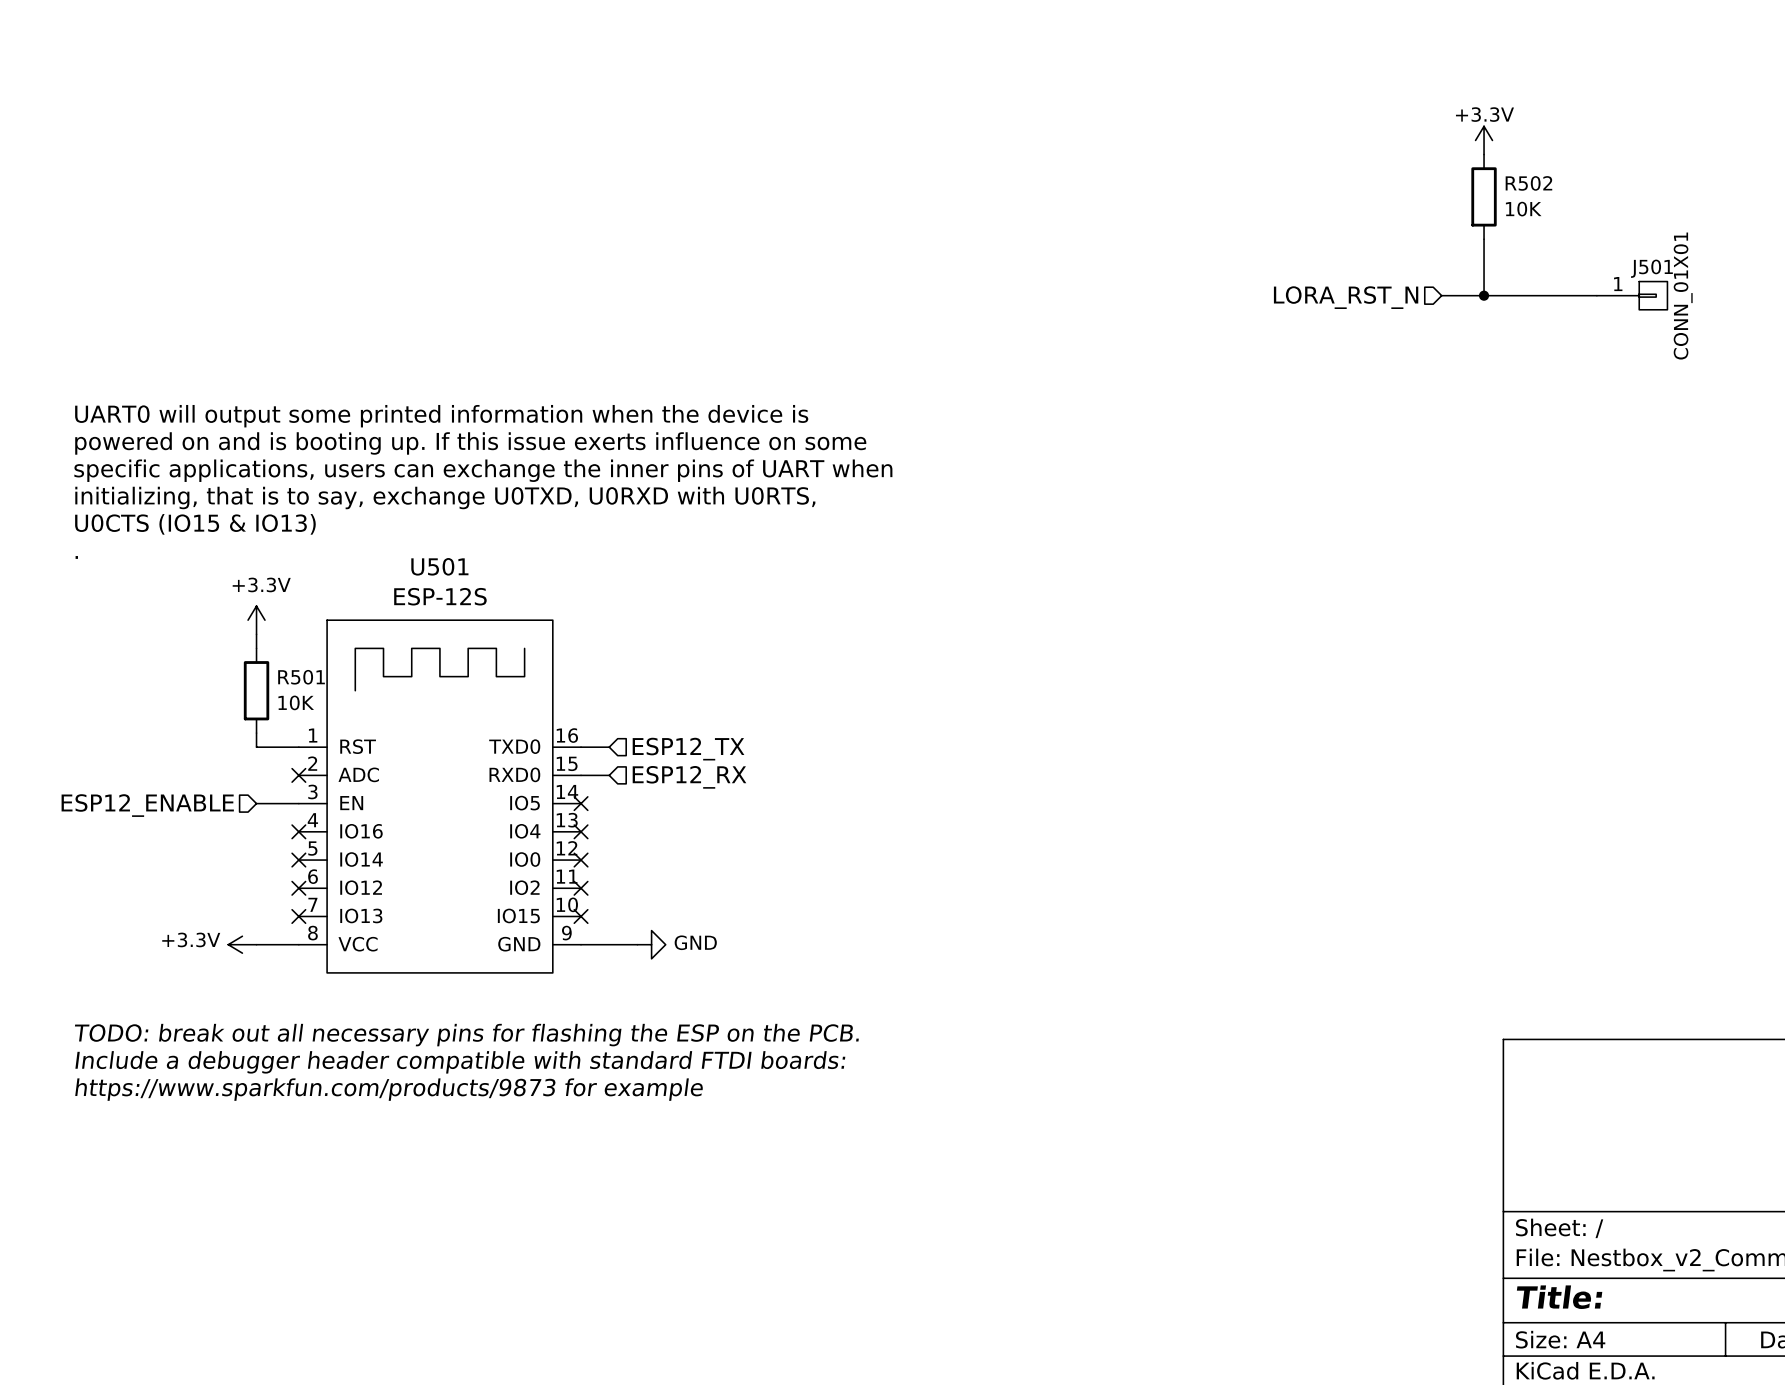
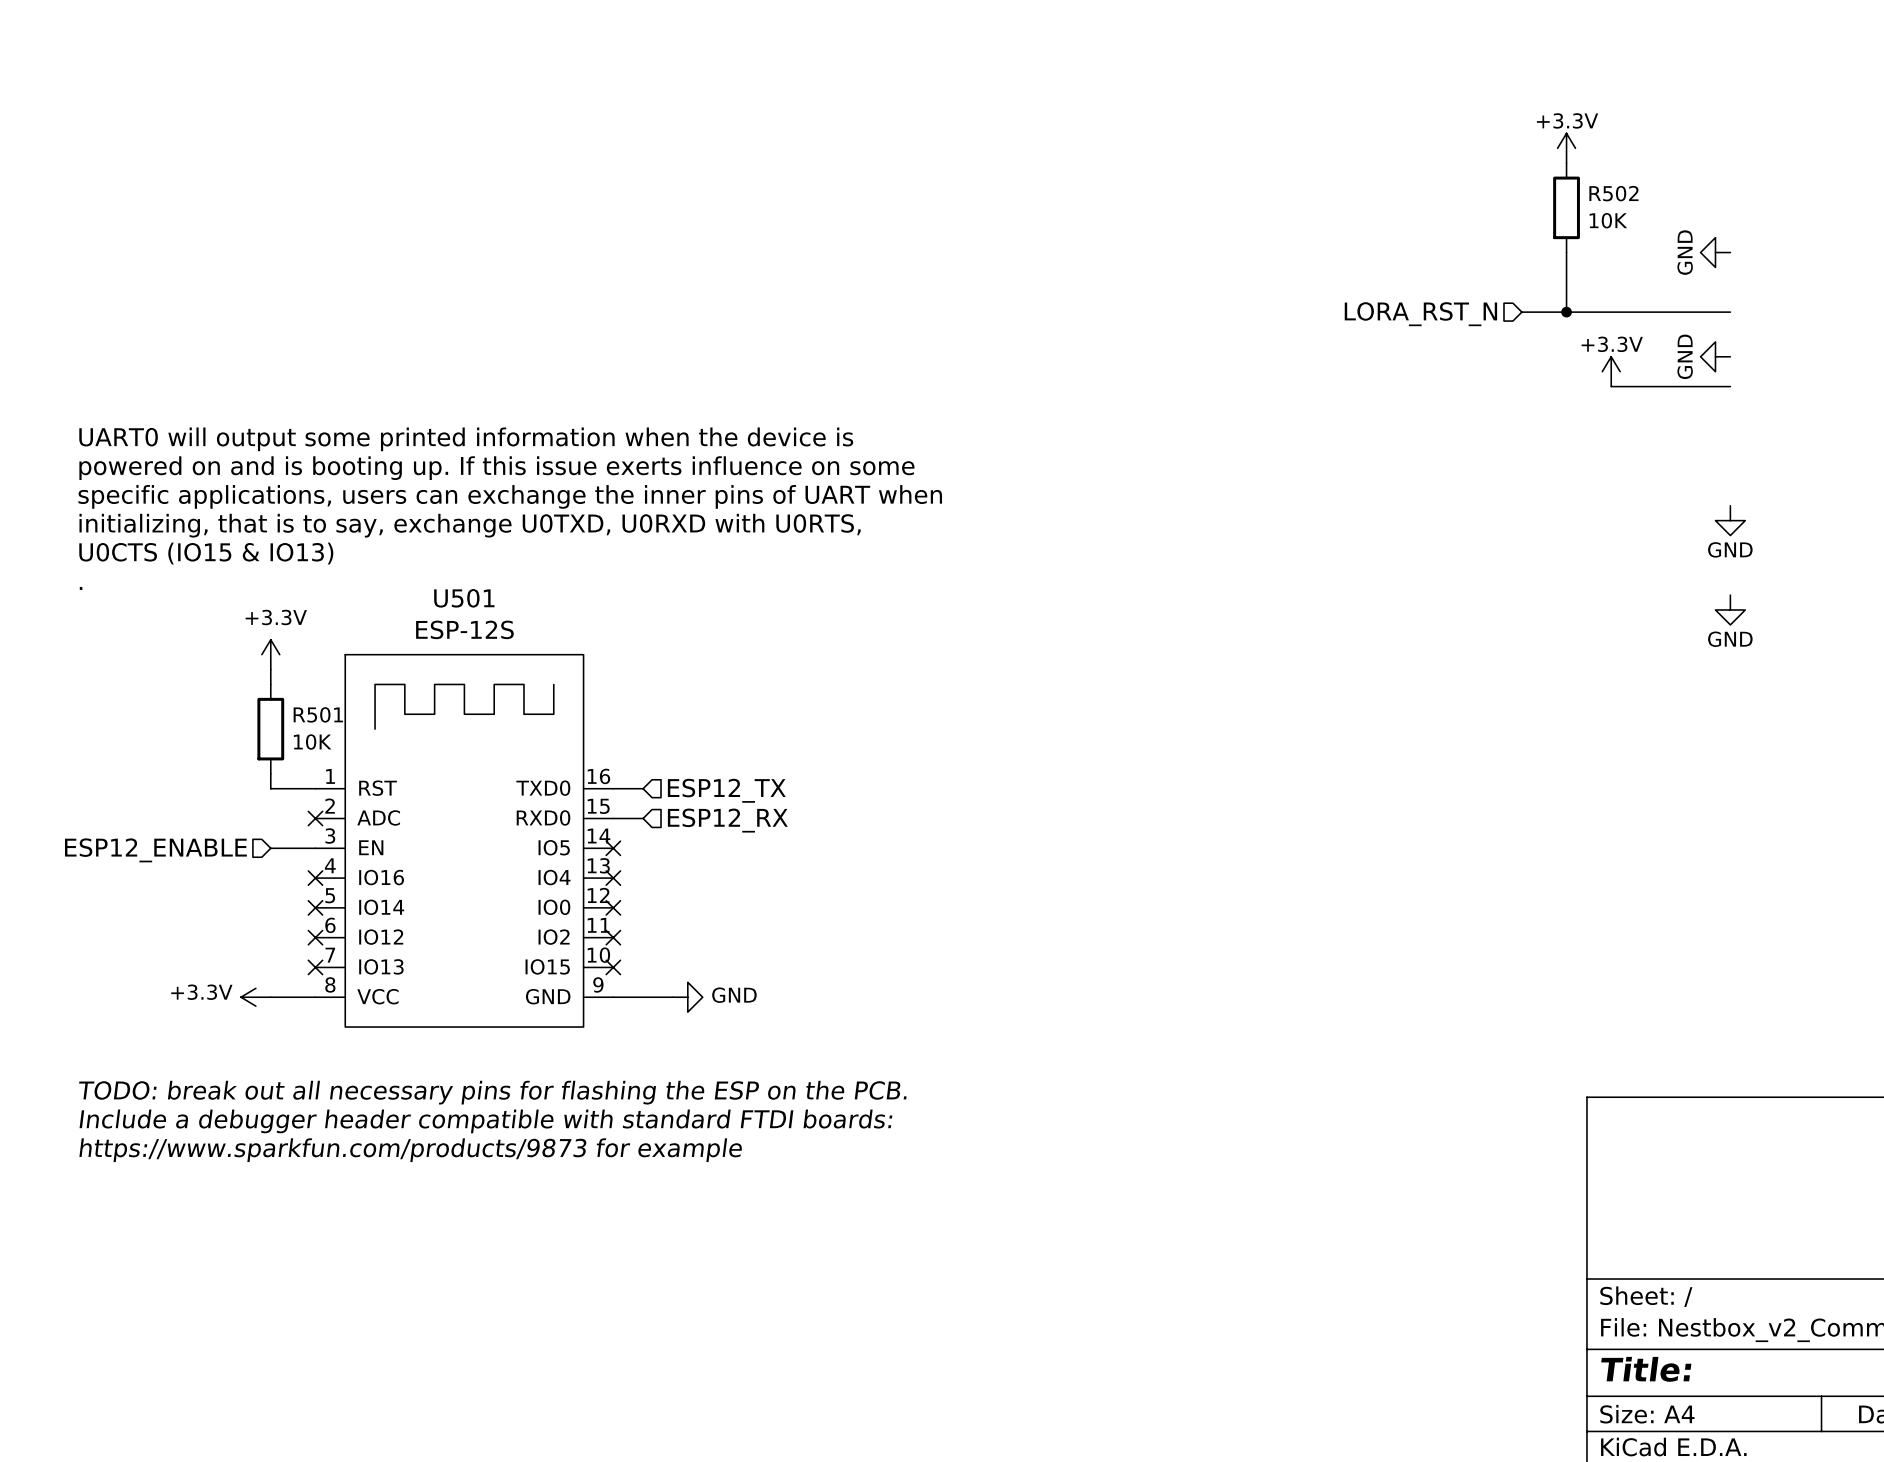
power symbol: none -> GND (1715, 252)
J501: CONN_01X01 (1632, 295) -> none
power symbol: none -> GND (1715, 356)
power symbol: none -> +3.3V (1611, 371)
wire: none -> (1611, 386) (1730, 386)
power symbol: none -> GND (1730, 520)
power symbol: none -> GND (1730, 609)

